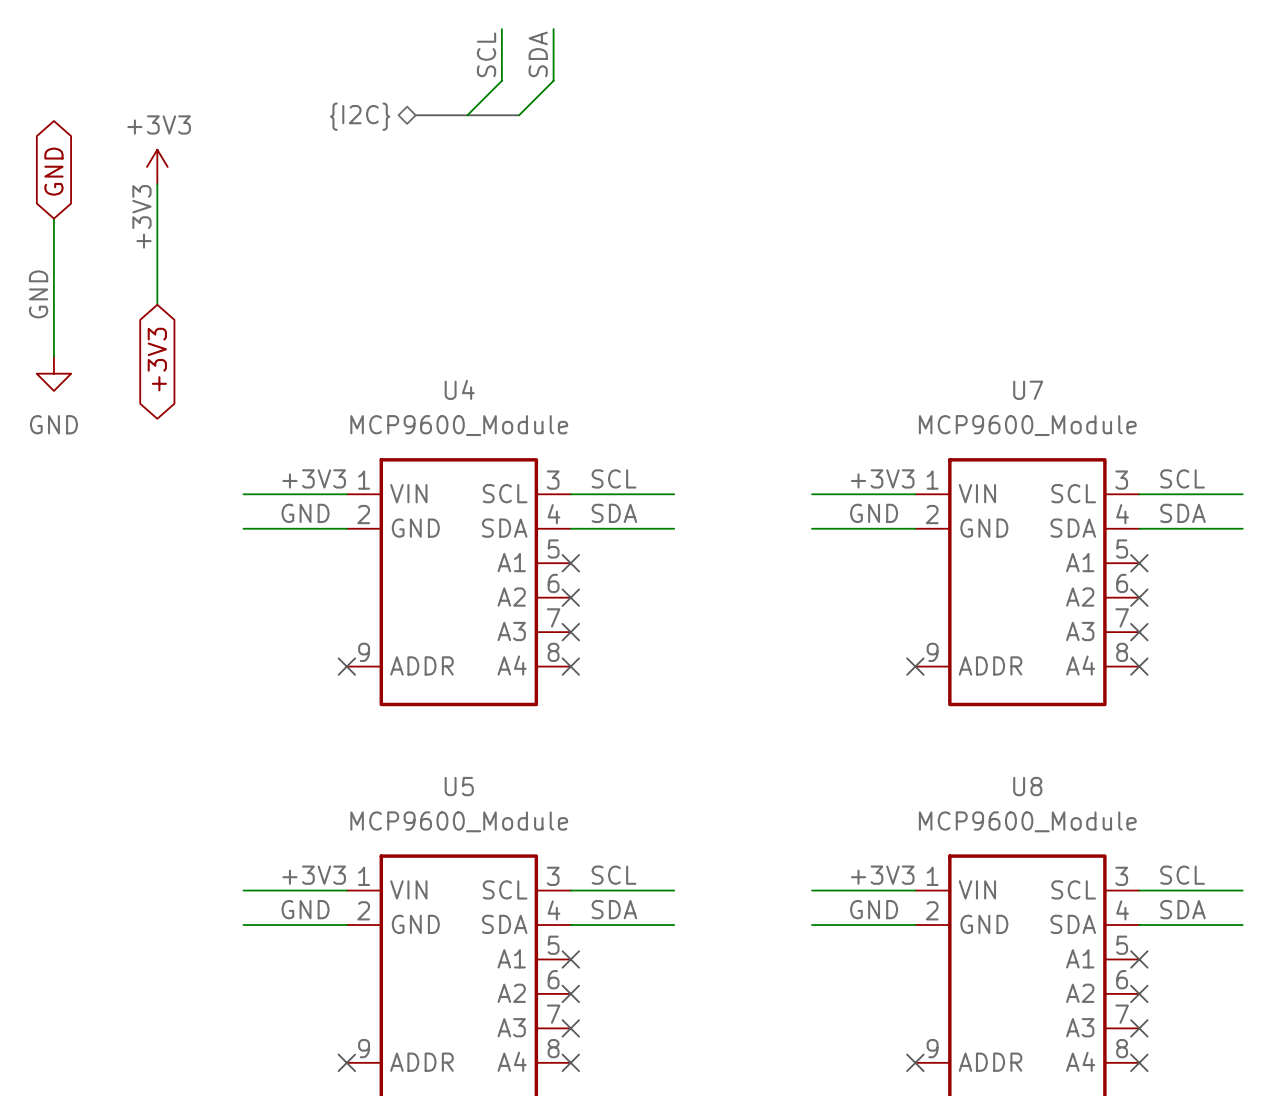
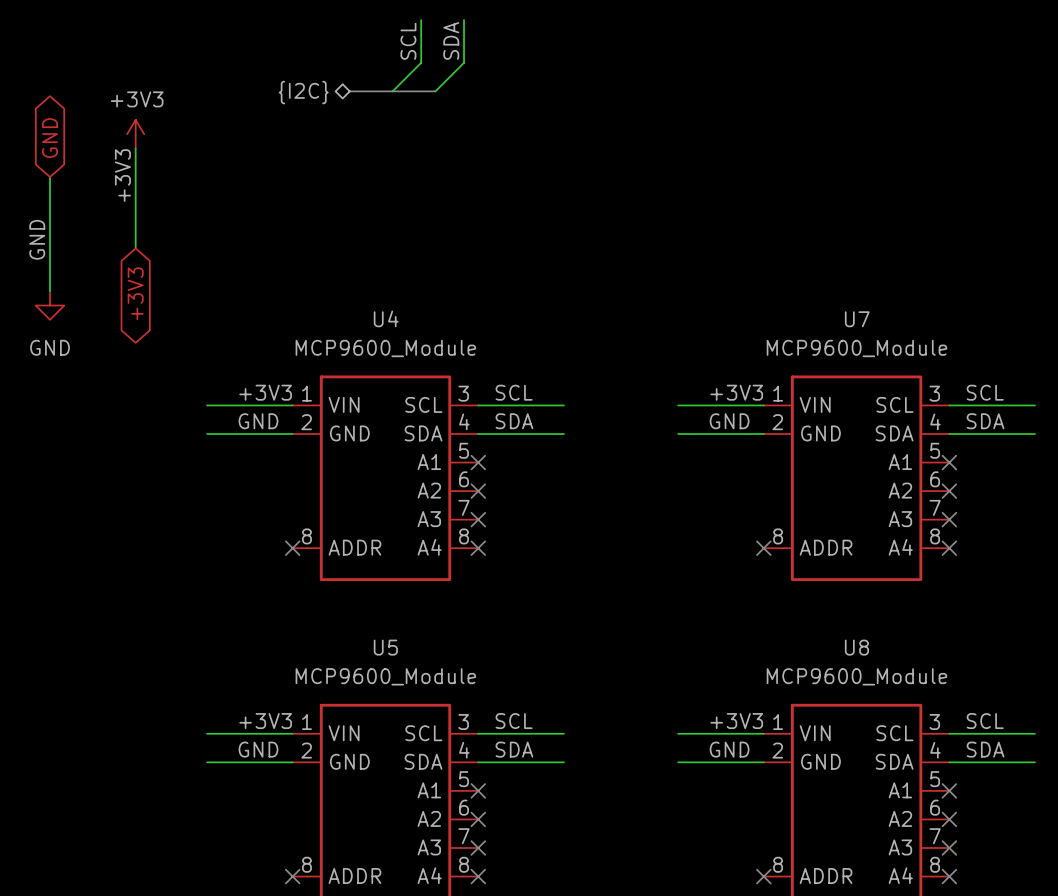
U4 pin number: 9 (364, 652) -> 8 (306, 536)
U7 pin number: 9 (932, 652) -> 8 (778, 536)
U5 pin number: 9 (364, 1048) -> 8 (306, 864)
U8 pin number: 9 (932, 1048) -> 8 (778, 864)

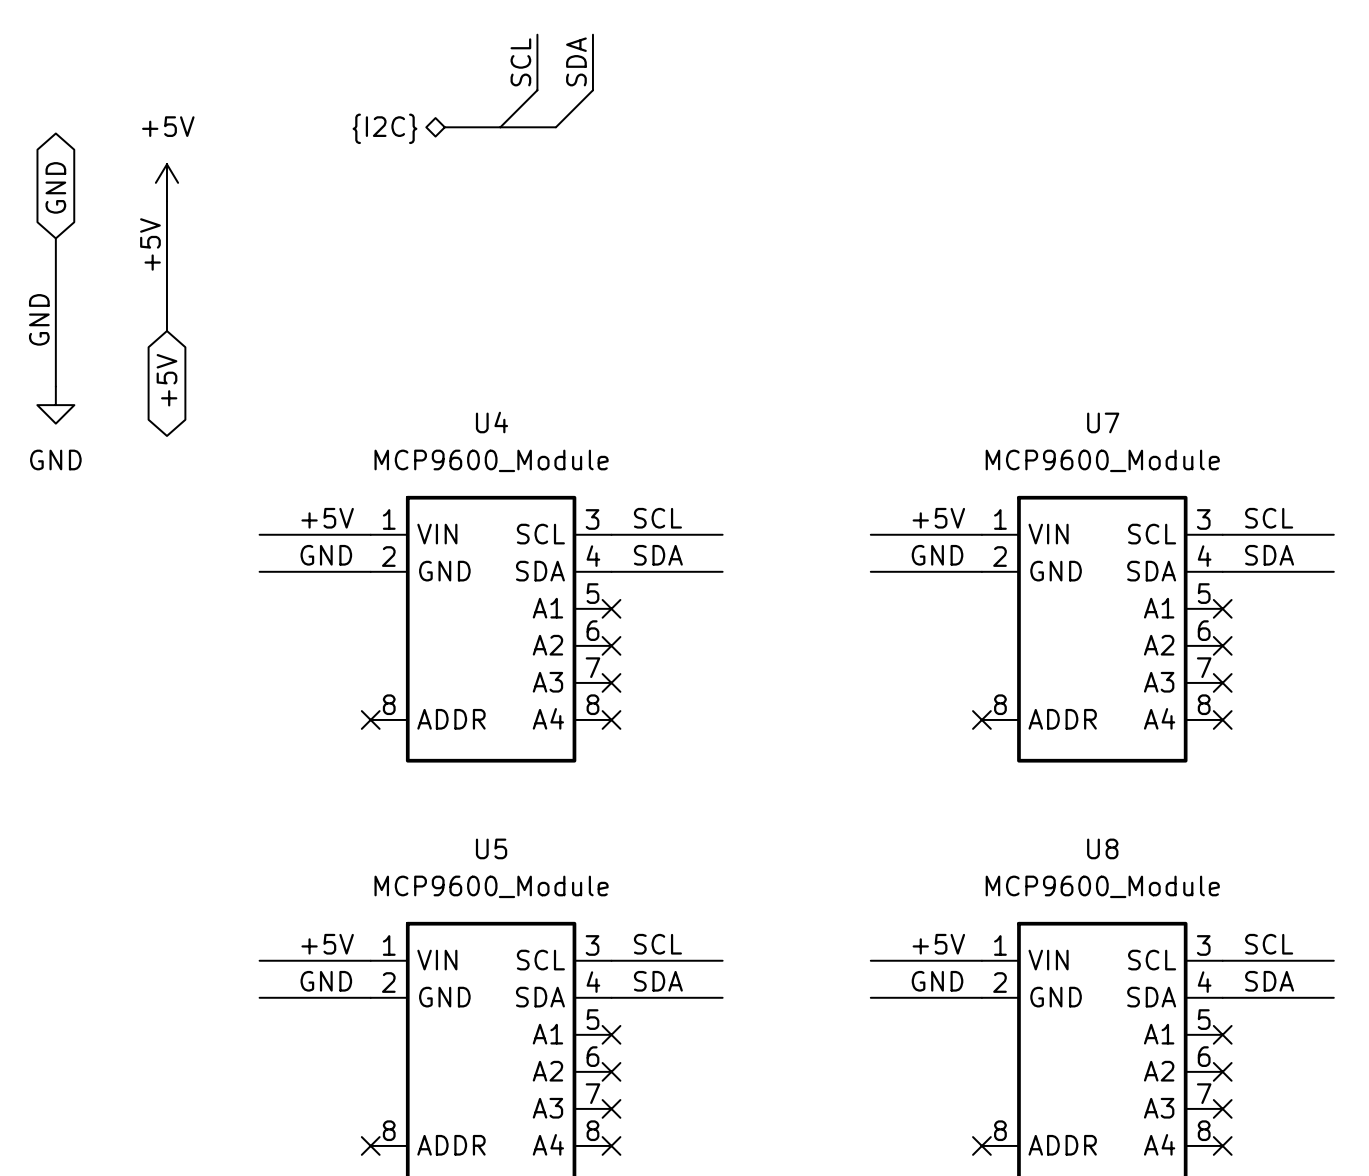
power symbol: +3V3 (135, 134) -> +5V (166, 182)
label: +3V3 (122, 175) -> +5V (150, 244)
global label: +3V3 (135, 293) -> +5V (166, 380)
label: +3V3 (265, 392) -> +5V (327, 518)
label: +3V3 (736, 392) -> +5V (938, 518)
label: +3V3 (265, 721) -> +5V (327, 944)
label: +3V3 (736, 721) -> +5V (938, 944)

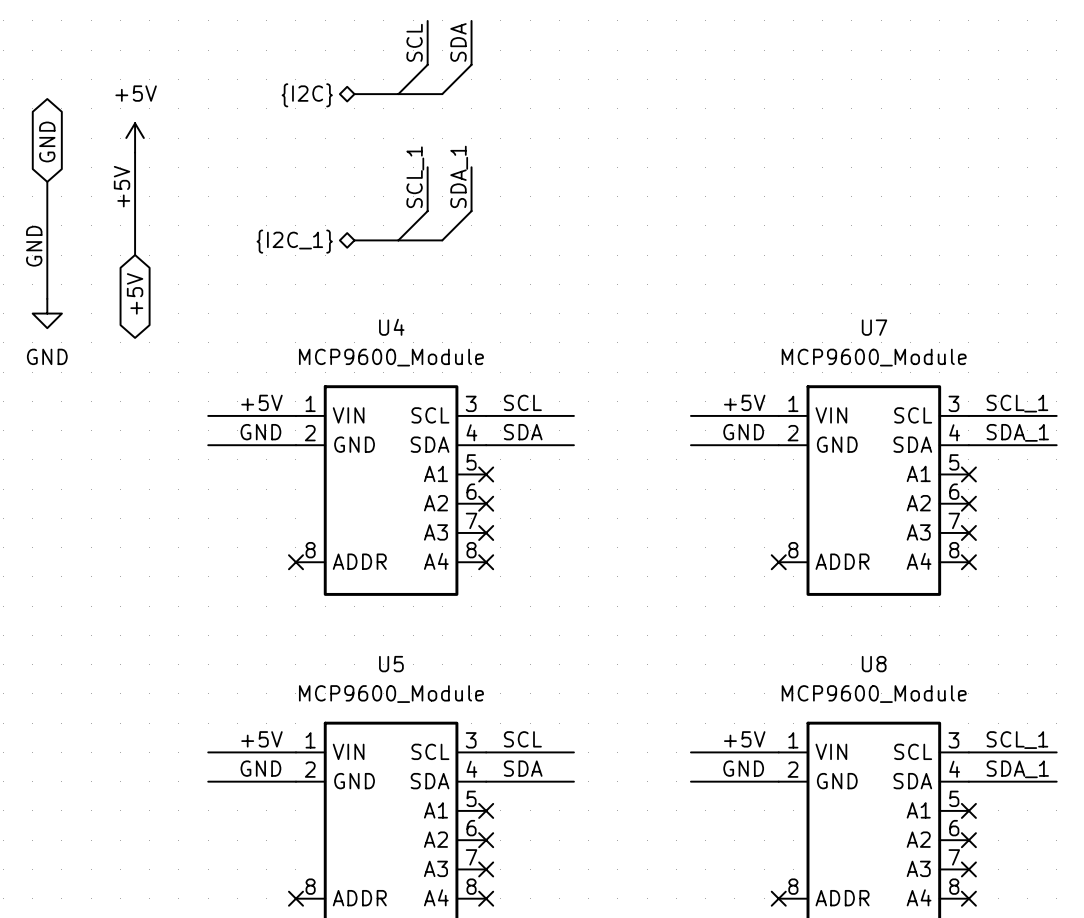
wire: none -> (427, 167) (427, 211) (398, 240)
wire: none -> (471, 167) (471, 211) (442, 240)
label: none -> SCL_1 (415, 177)
label: none -> SDA_1 (459, 176)
bus: none -> (354, 240) (442, 240)
hierarchical label: none -> {I2C_1} (294, 241)
label: SCL (1269, 518) -> SCL_1 (1017, 403)
label: SDA (1269, 555) -> SDA_1 (1017, 432)
label: SCL (1269, 944) -> SCL_1 (1017, 740)
label: SDA (1269, 981) -> SDA_1 (1017, 769)

